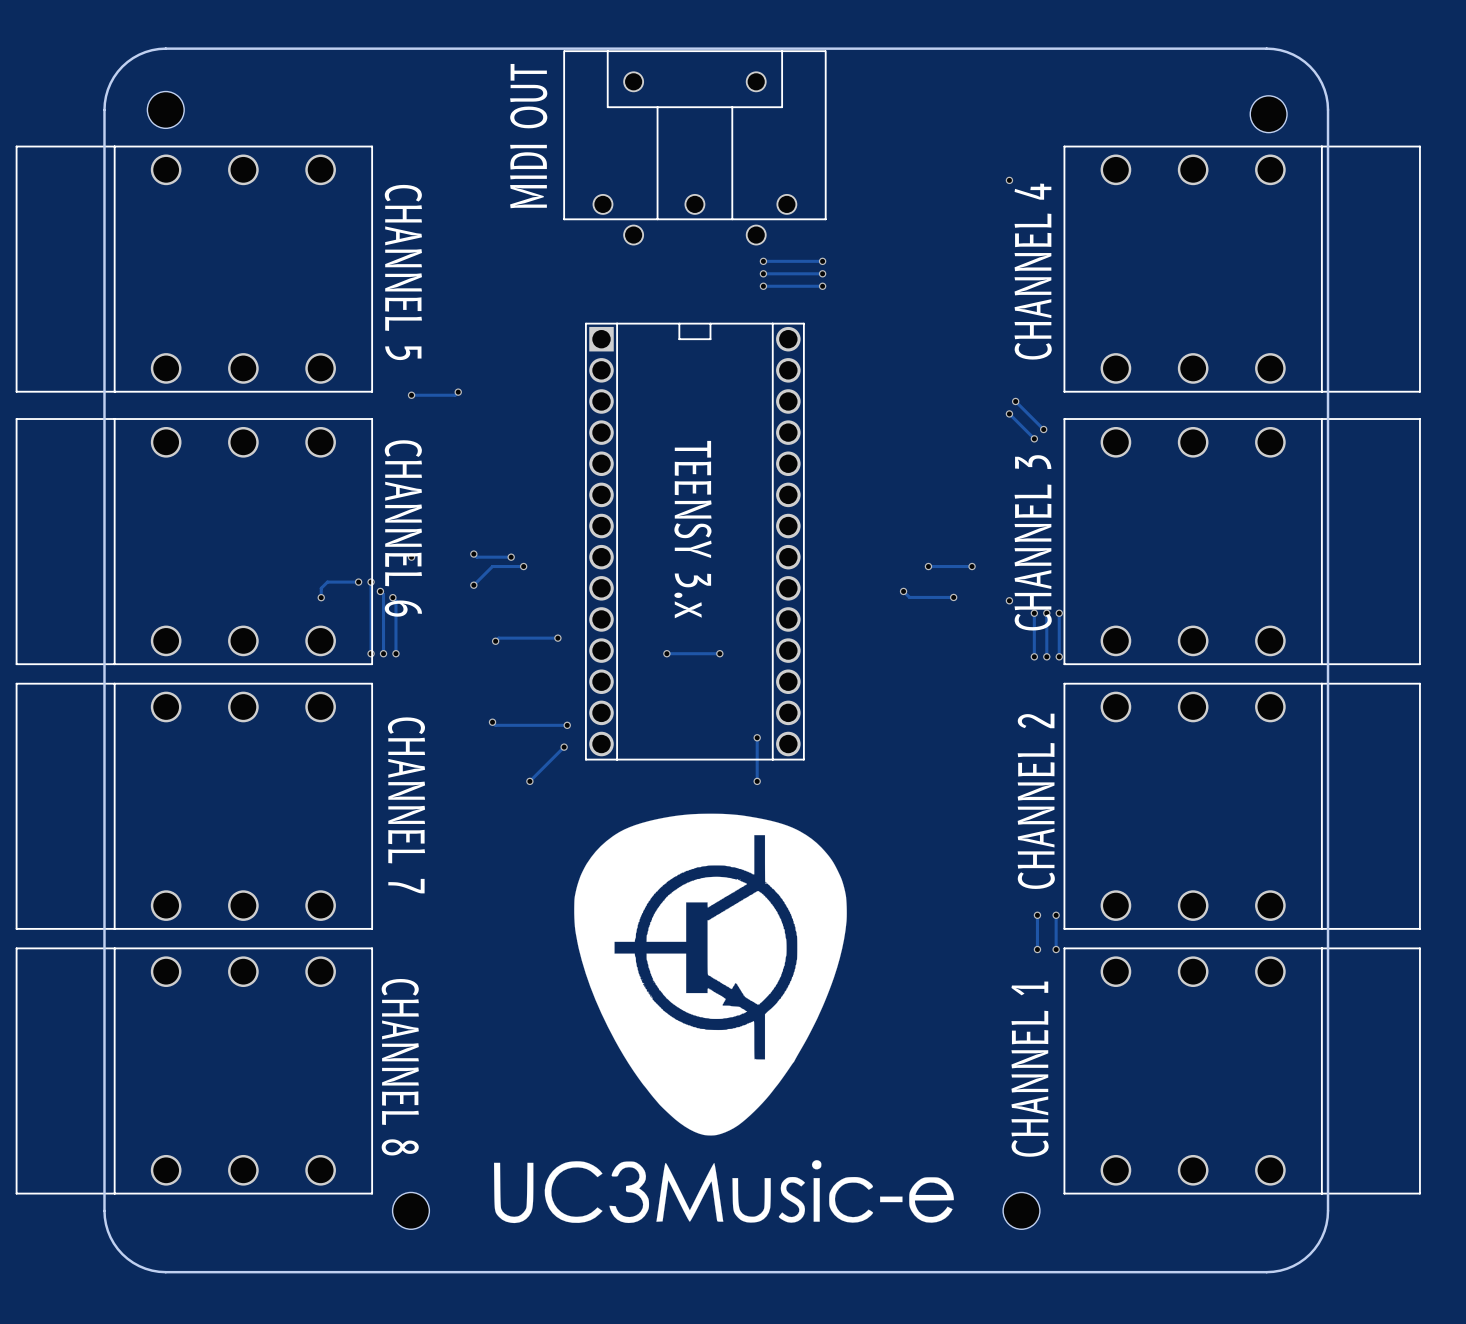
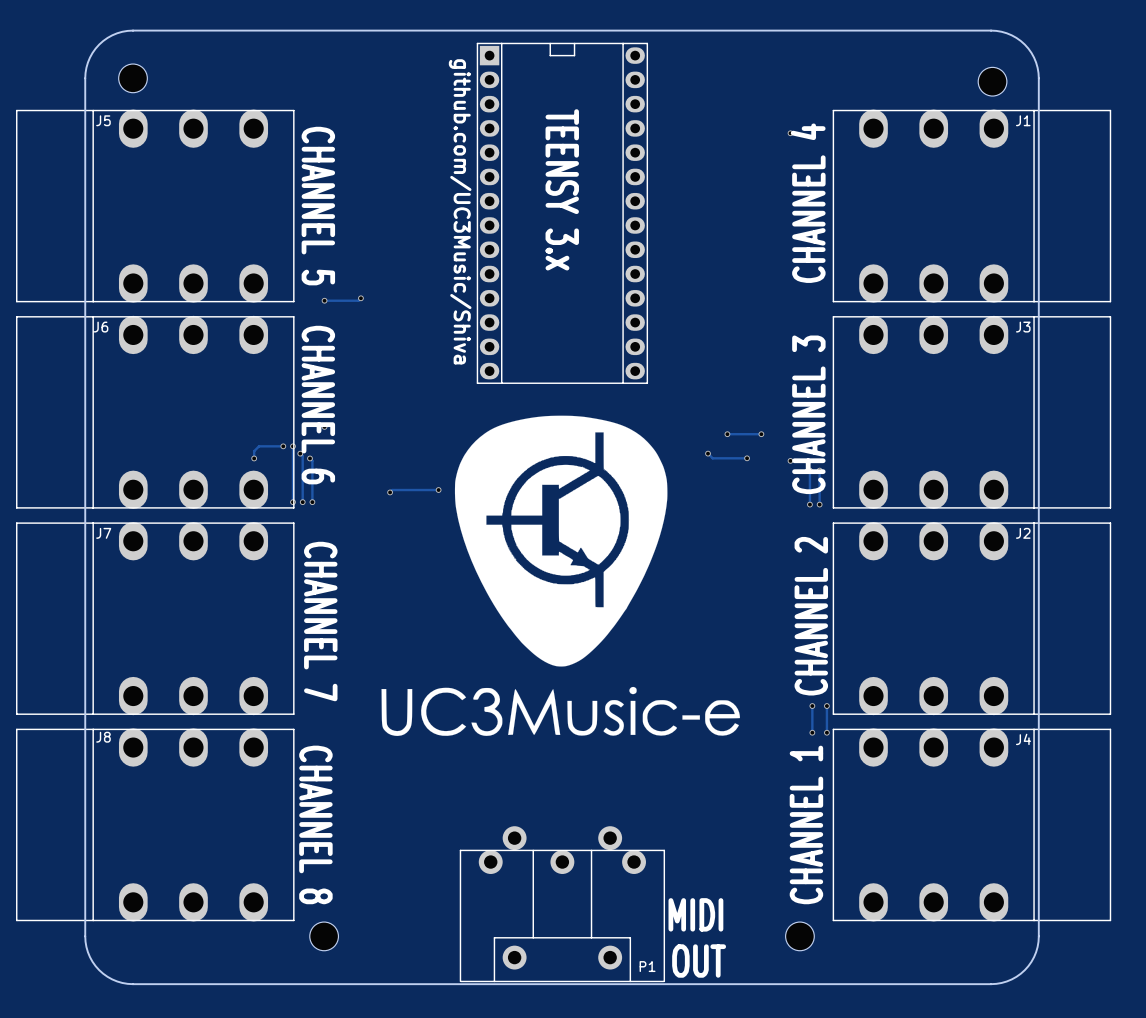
text: MIDI OUT (528, 136) -> none
part: (694, 147) -> none
via: (763, 261) -> none
track: (822, 261) (763, 261) -> none
via: (822, 261) -> none
part: (194, 269) -> none
part: (1242, 269) -> none
J5: none -> (155, 206)
via: (763, 273) -> none
track: (822, 273) (763, 273) -> none
via: (822, 273) -> none
J1: none -> (971, 206)
text: none -> github.com/UC3Music/Shiva (460, 211)
part: none -> (562, 213)
via: (763, 286) -> none
track: (822, 286) (763, 286) -> none
via: (822, 286) -> none
track: (1015, 401) (1043, 429) -> none
via: (1015, 401) -> none
track: (1009, 413) (1034, 438) -> none
via: (1009, 413) -> none
via: (1043, 429) -> none
via: (1034, 438) -> none
text position: TEENSY 3.x (692, 529) -> TEENSY 3.x (562, 189)
J6: none -> (155, 412)
J3: none -> (971, 412)
part: (194, 541) -> none
part: (694, 541) -> none
part: (1242, 541) -> none
track: (473, 554) (476, 557) (511, 557) -> none
via: (473, 554) -> none
via: (511, 557) -> none
track: (523, 566) (492, 566) (473, 585) -> none
via: (523, 566) -> none
via: (473, 585) -> none
track: (1059, 613) (1059, 656) -> none
via: (1059, 613) -> none
via: (666, 653) -> none
track: (719, 653) (666, 653) -> none
via: (719, 653) -> none
via: (1059, 656) -> none
track: (492, 722) (495, 725) (567, 725) -> none
via: (492, 722) -> none
via: (567, 725) -> none
track: (757, 737) (757, 781) -> none
via: (757, 737) -> none
track: (564, 747) (529, 781) -> none
via: (564, 747) -> none
via: (529, 781) -> none
via: (757, 781) -> none
J7: none -> (155, 618)
J2: none -> (971, 618)
part: (194, 806) -> none
part: (1242, 806) -> none
drawing position: (710, 974) -> (561, 541)
J8: none -> (155, 824)
J4: none -> (971, 824)
part: (194, 1070) -> none
part: (1242, 1070) -> none
P1: none -> (562, 904)
text: none -> MIDI (695, 914)
drawing position: (723, 1191) -> (560, 711)
text: none -> OUT (699, 961)

